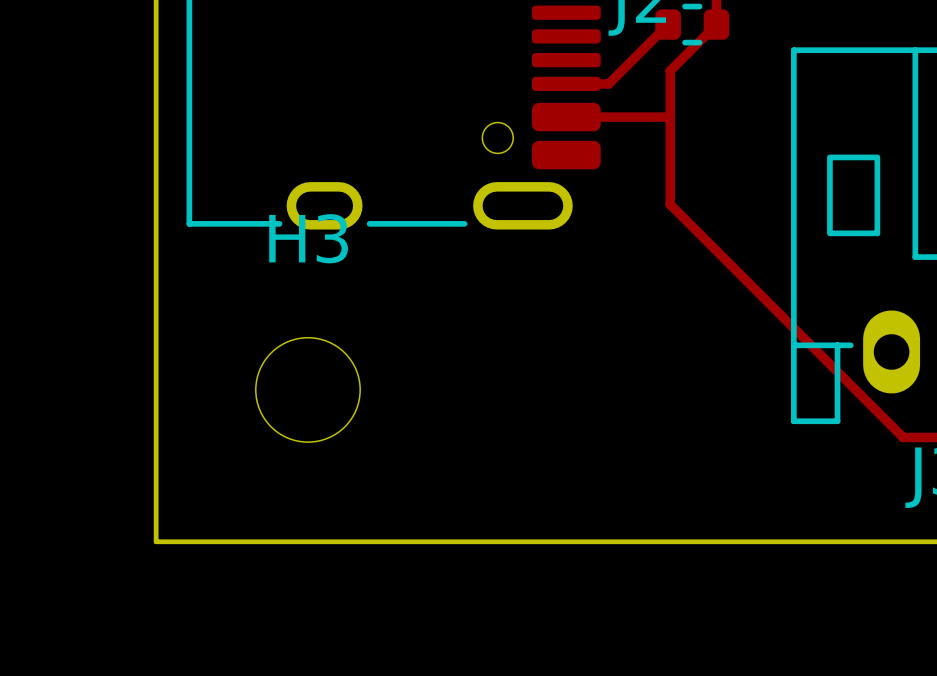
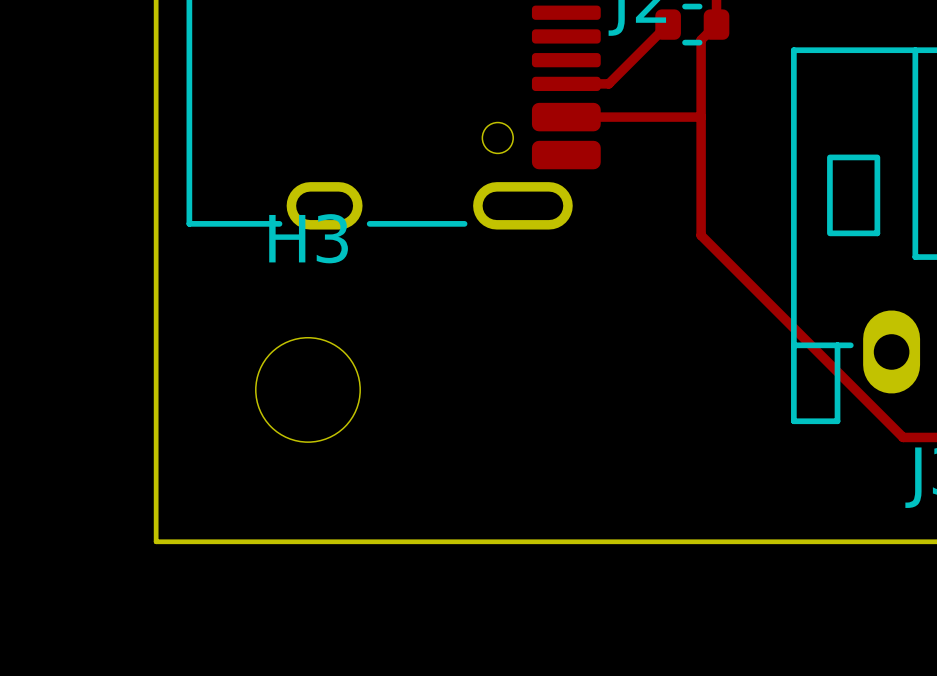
top track: (701, 39) (670, 70) (670, 204) (701, 235) -> (701, 39) (701, 235)
top track: none -> (670, 117) (701, 117)

